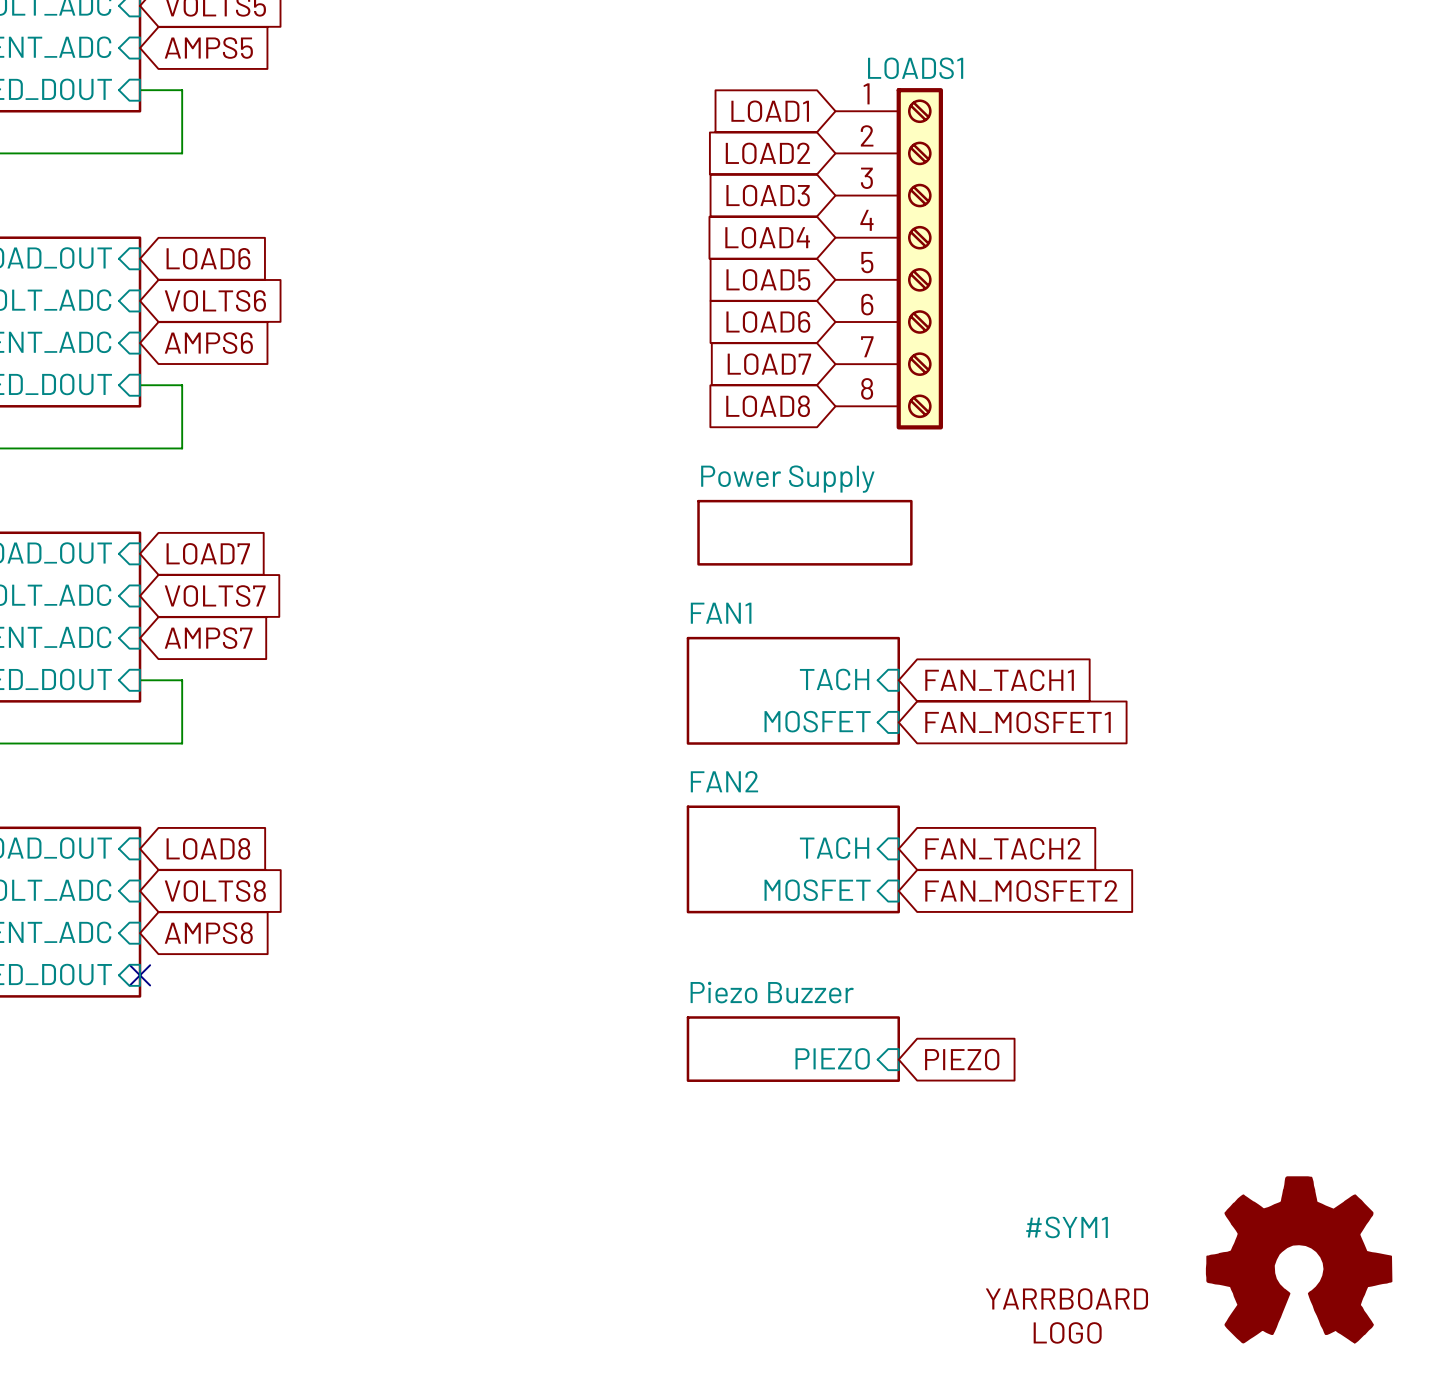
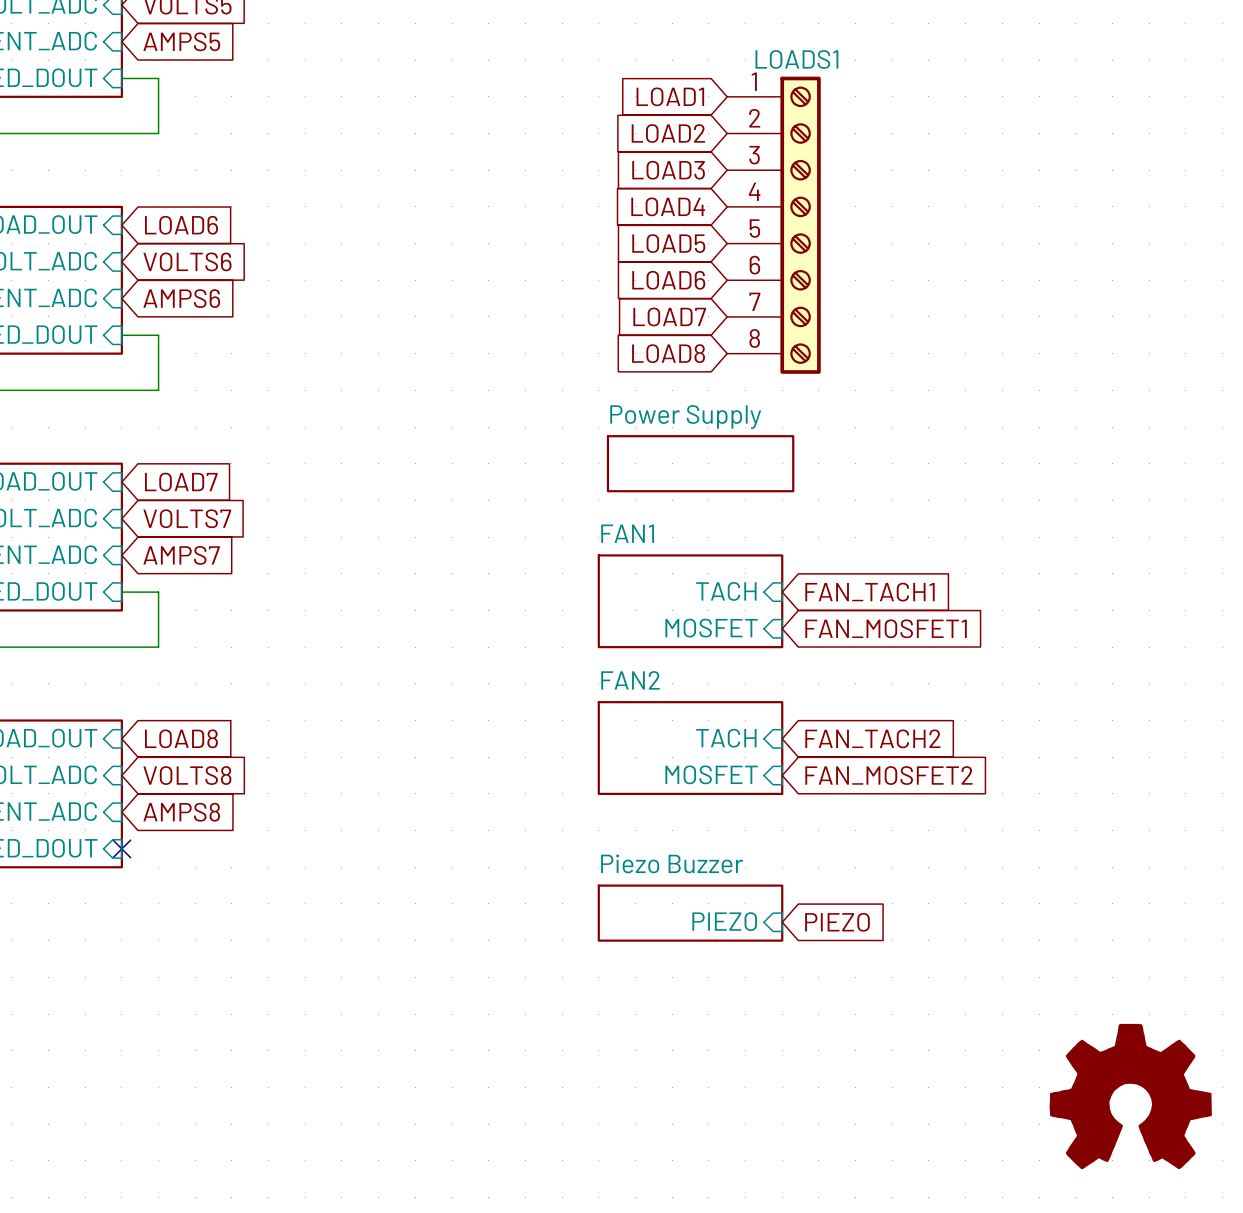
#SYM1: (1066, 1280) -> none

